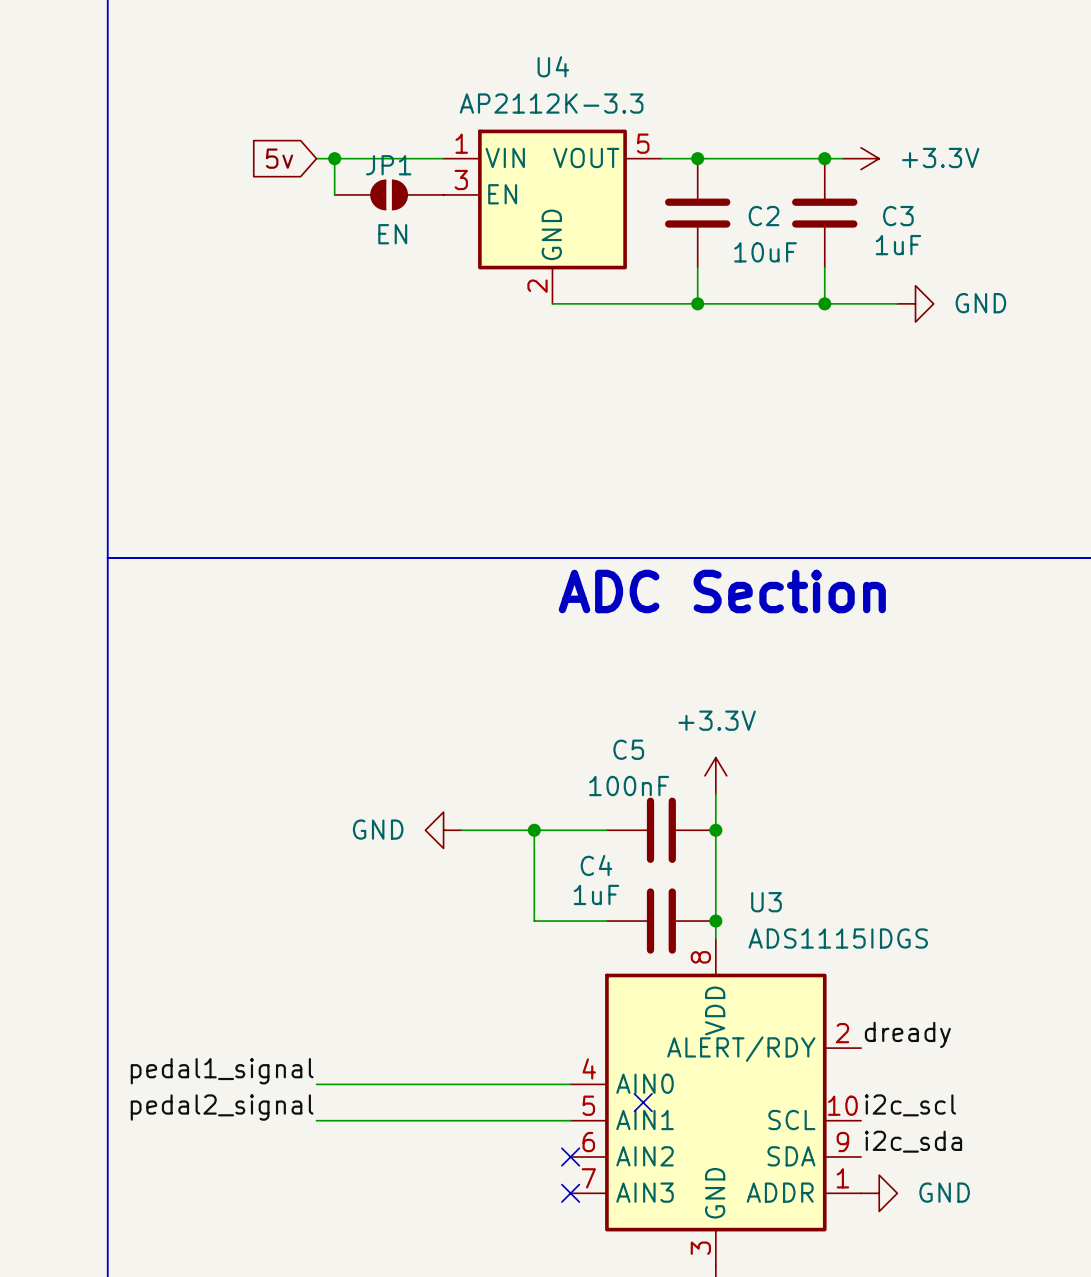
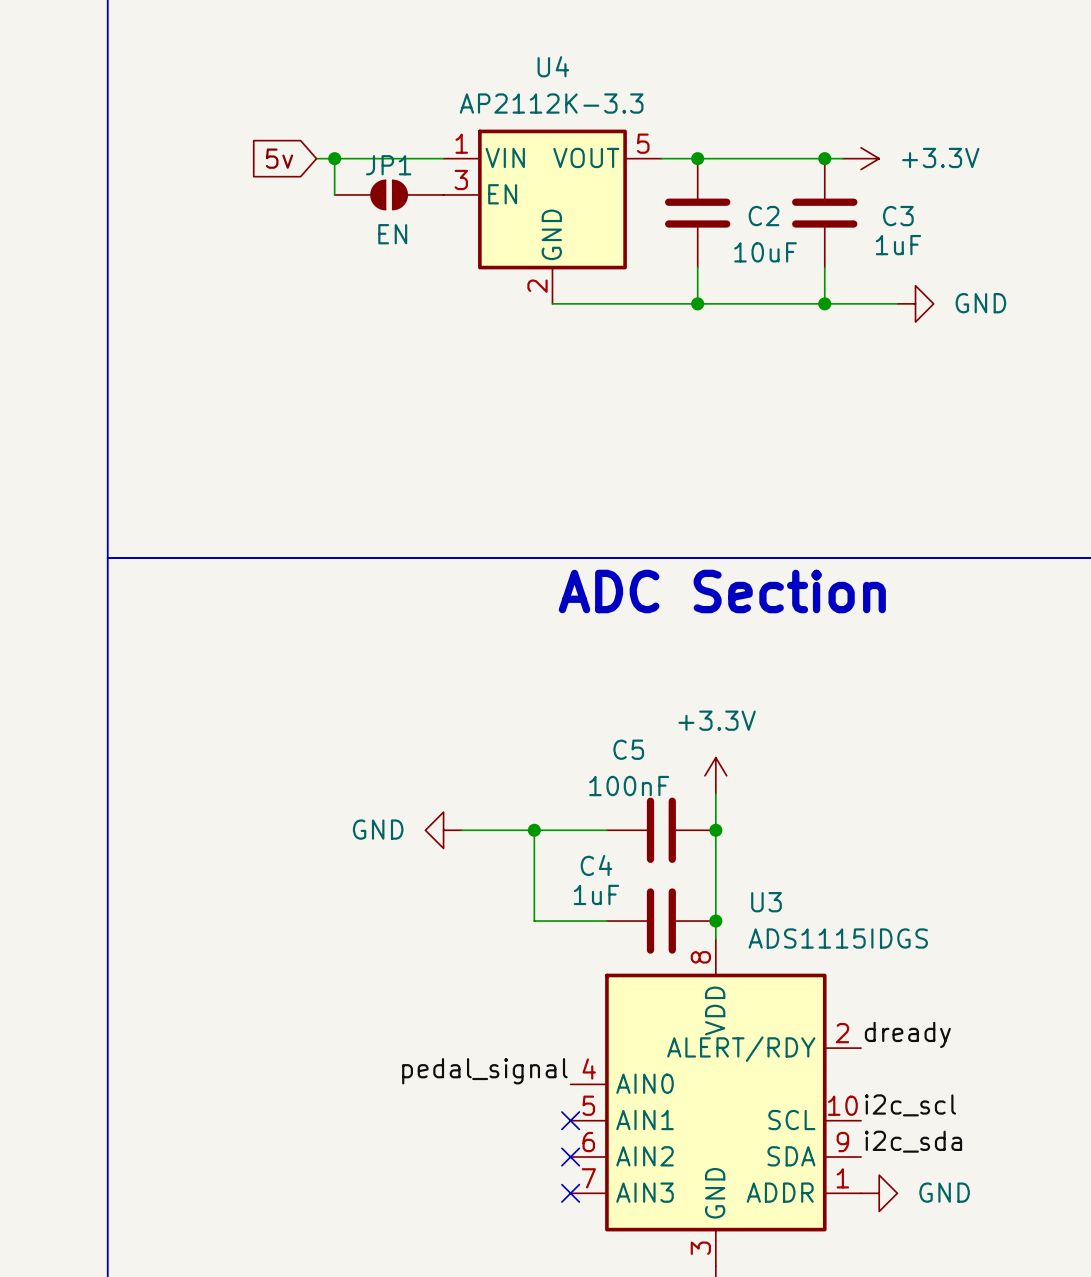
label: pedal1_signal (222, 1071) -> none
label: none -> pedal_signal (484, 1071)
wire: (316, 1084) (570, 1084) -> none
no-connect mark position: (643, 1102) -> (570, 1120)
label: pedal2_signal (222, 1107) -> none
wire: (316, 1120) (570, 1120) -> none

